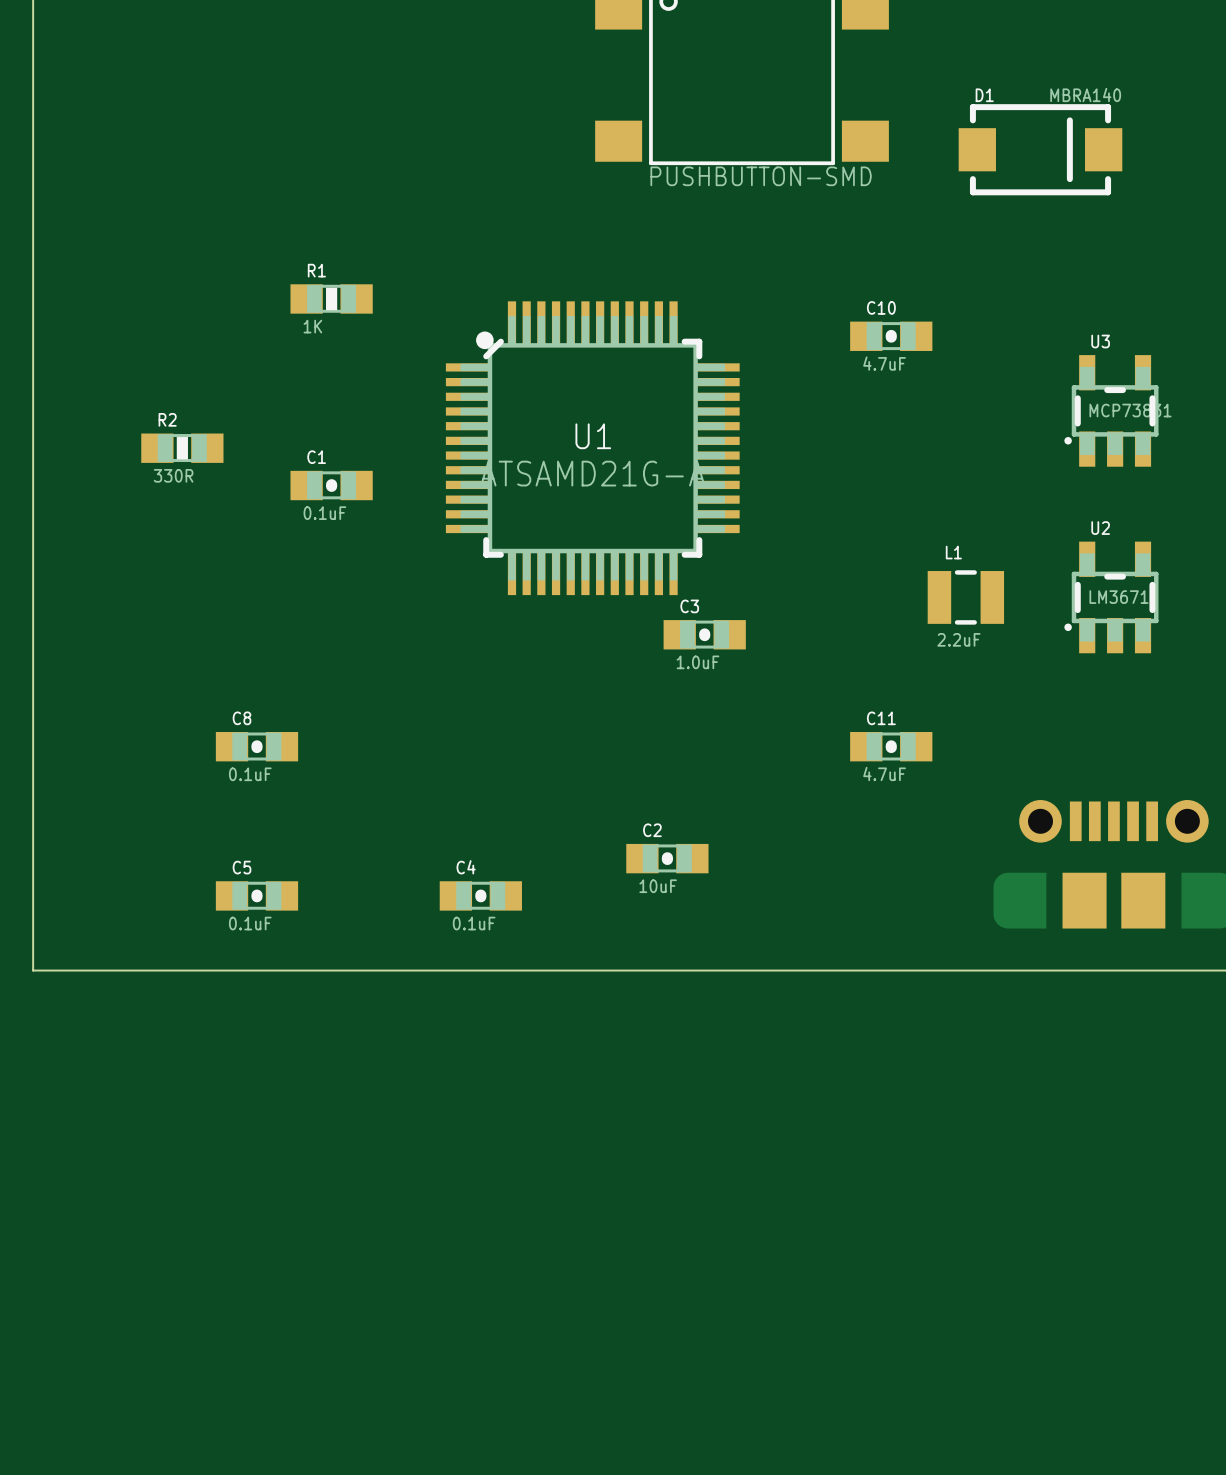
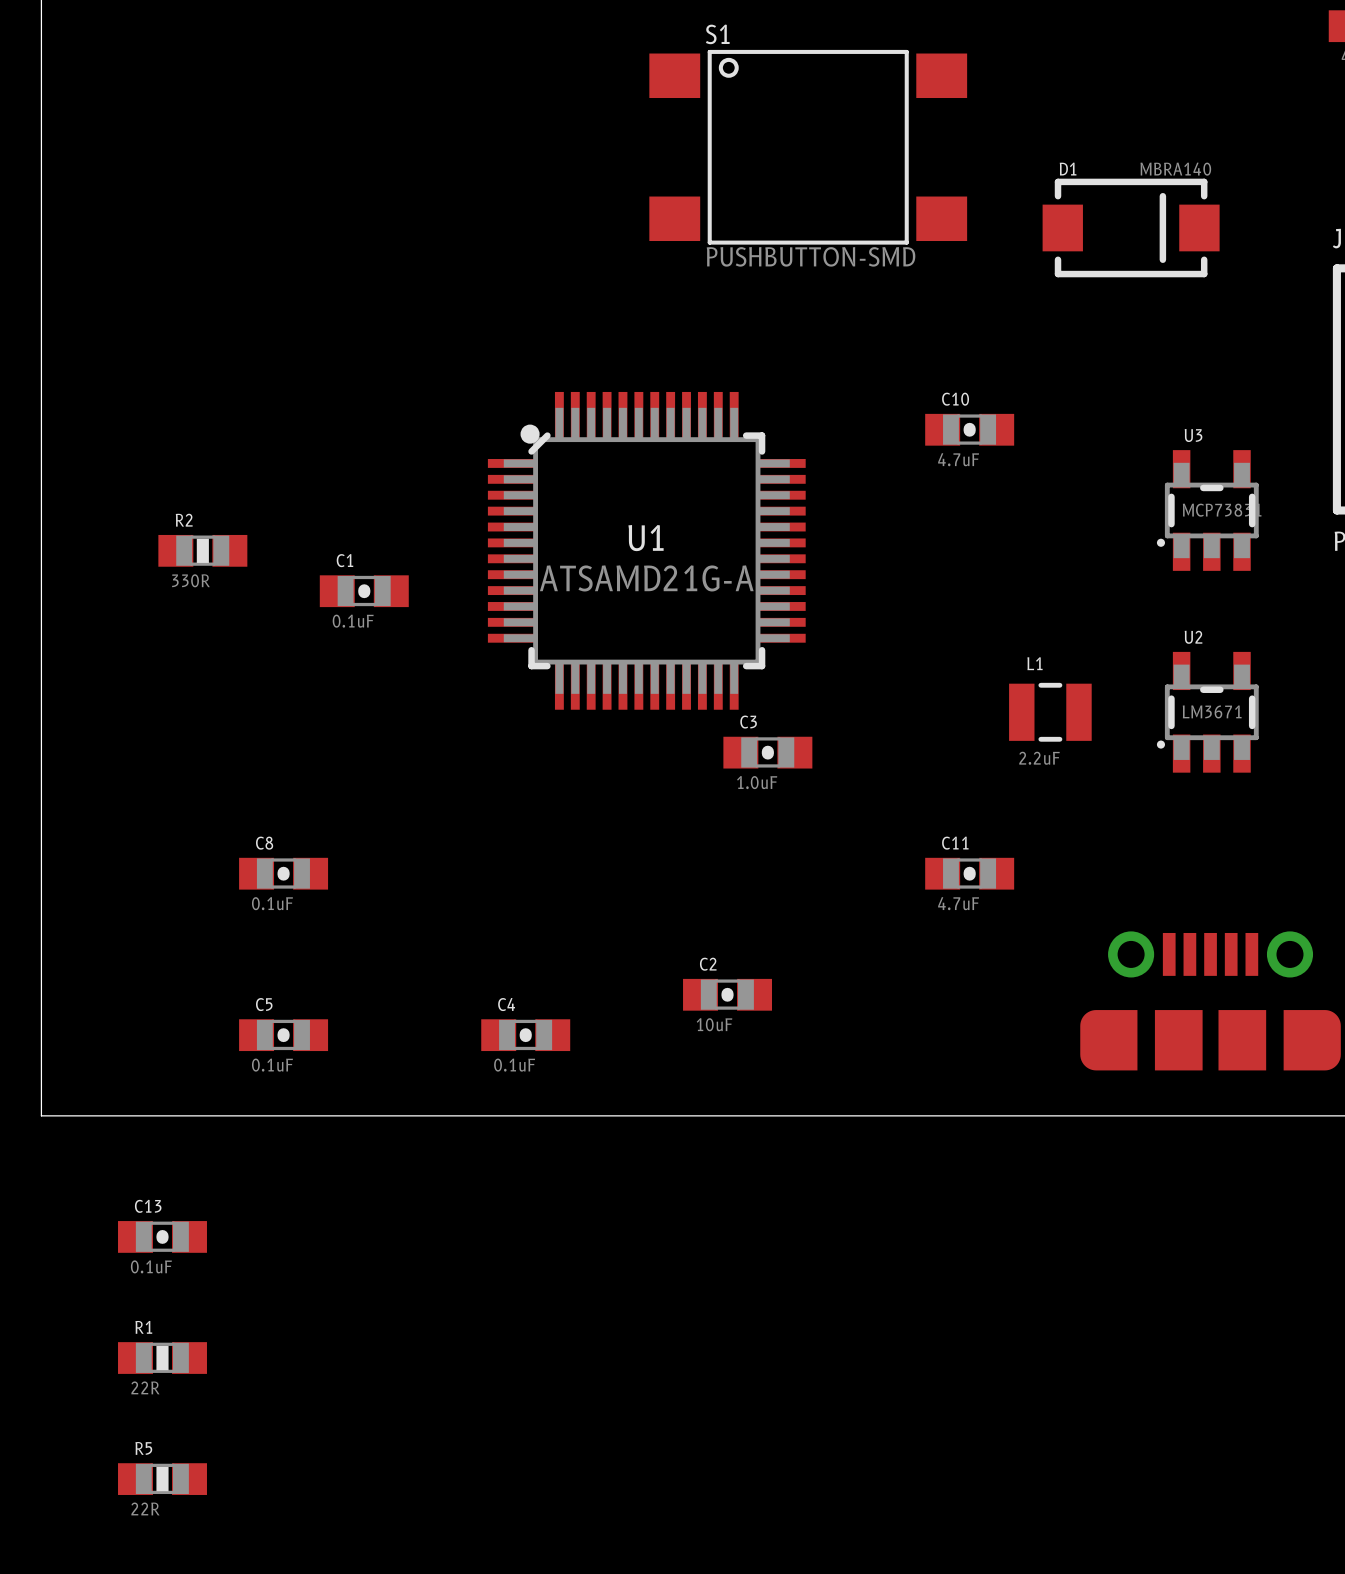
R1 position: (331, 298) -> (162, 1358)
R1 value: 1K (312, 326) -> 22R (145, 1387)
C13: none -> 0.1uF (162, 1236)
R5: none -> 22R (162, 1479)

